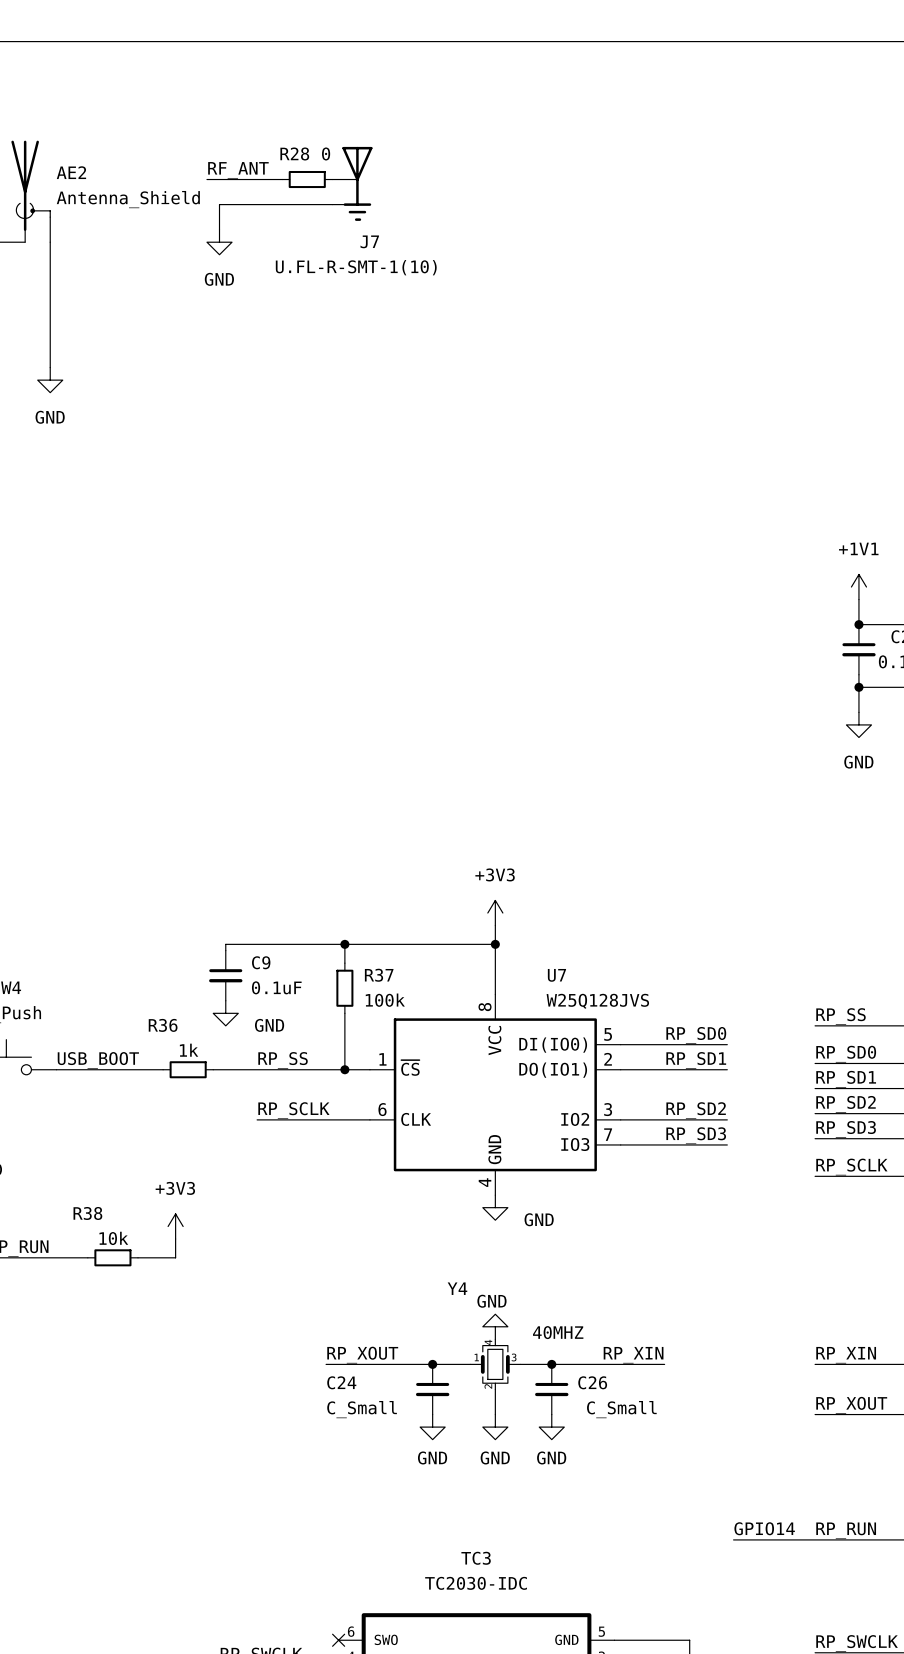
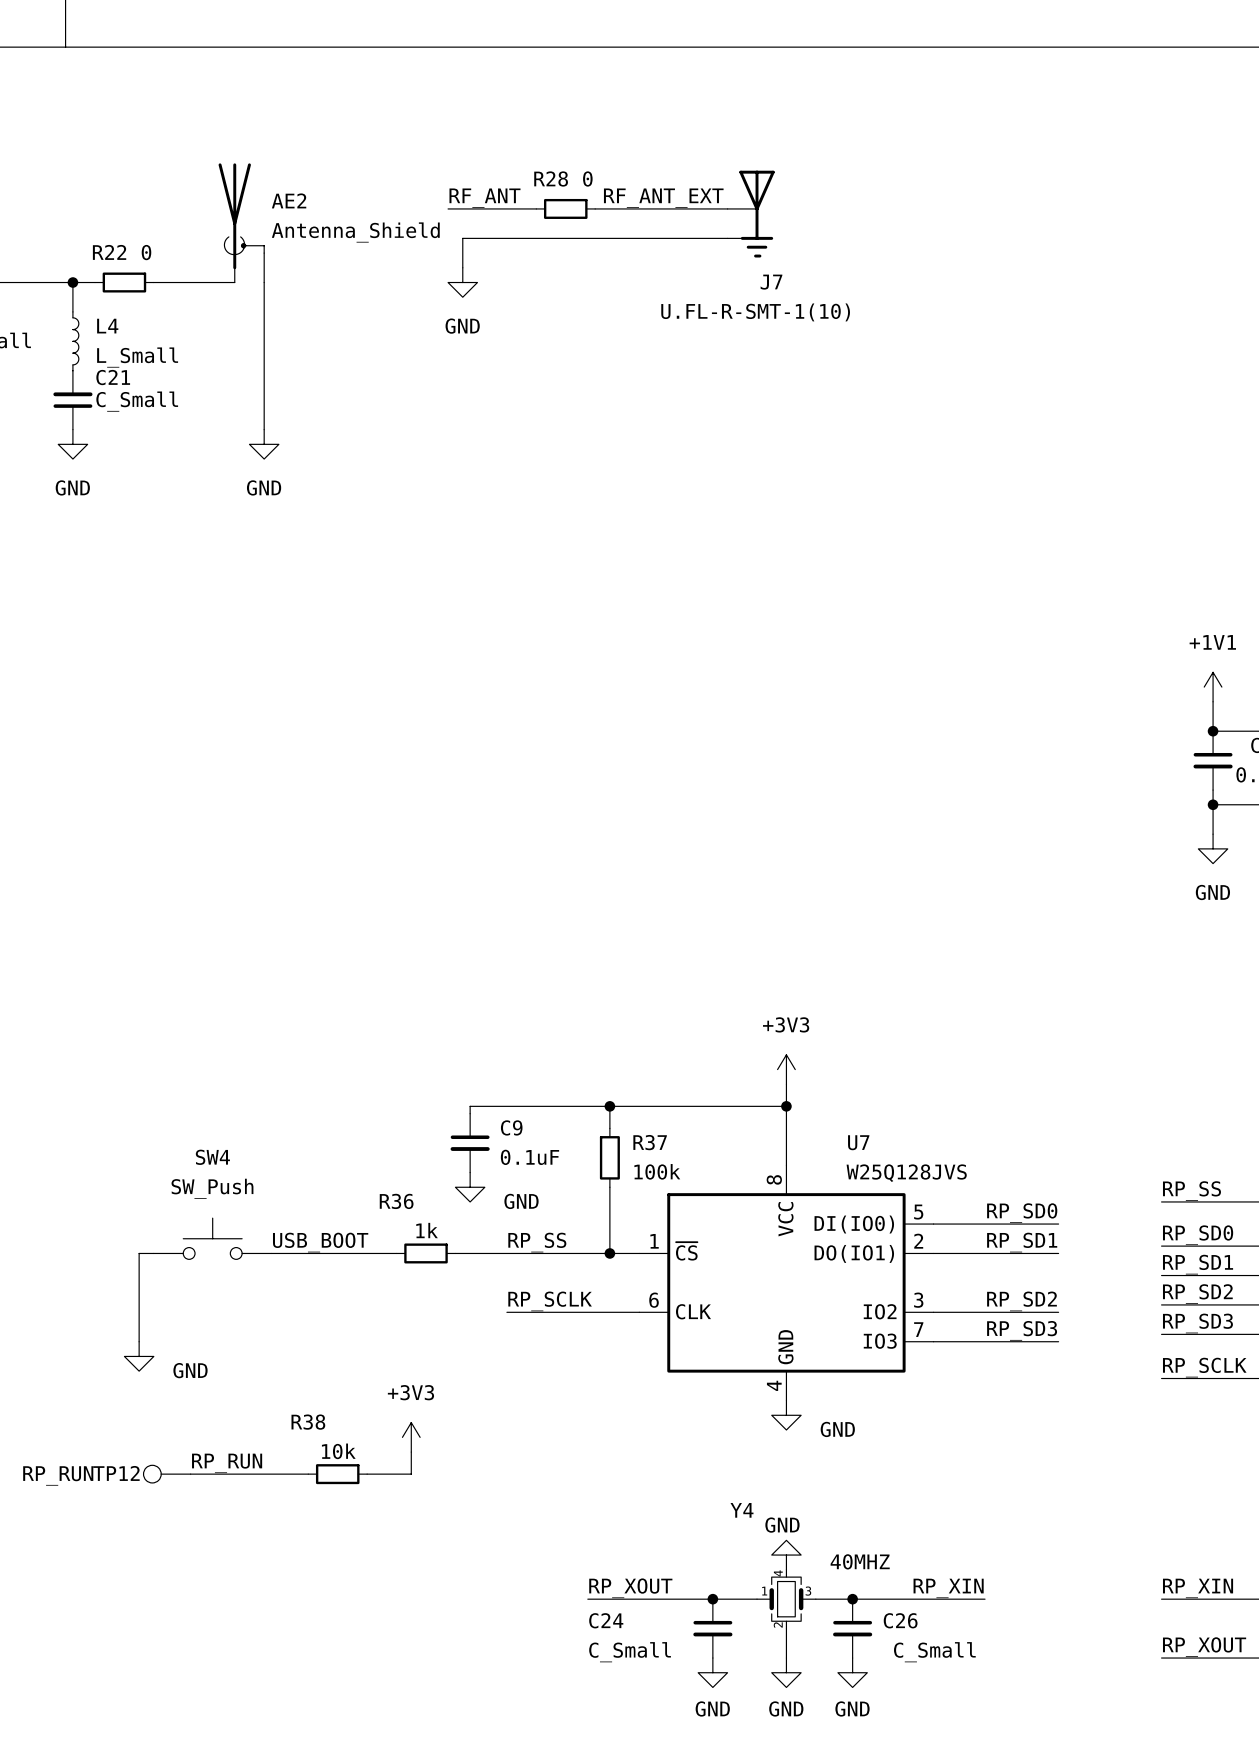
label: none -> RF_ANT_EXT (663, 198)
wire: none -> (595, 208) (727, 208)
J7 position: (352, 183) -> (751, 214)
wire: none -> (595, 238) (727, 238)

